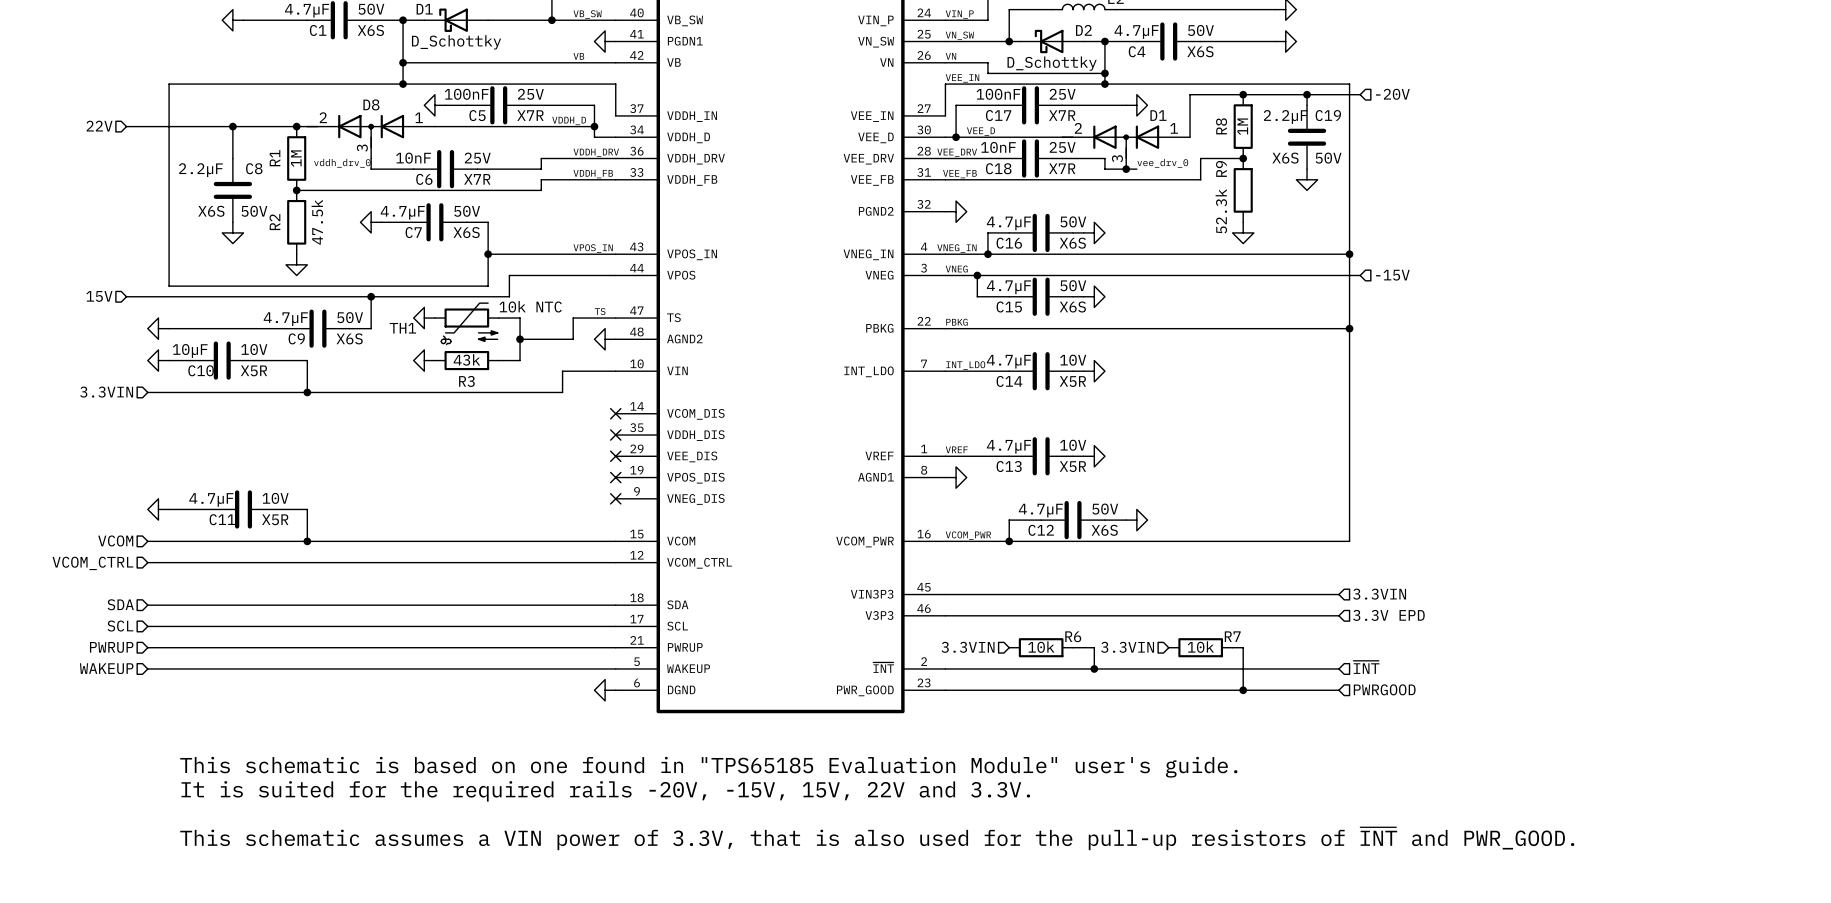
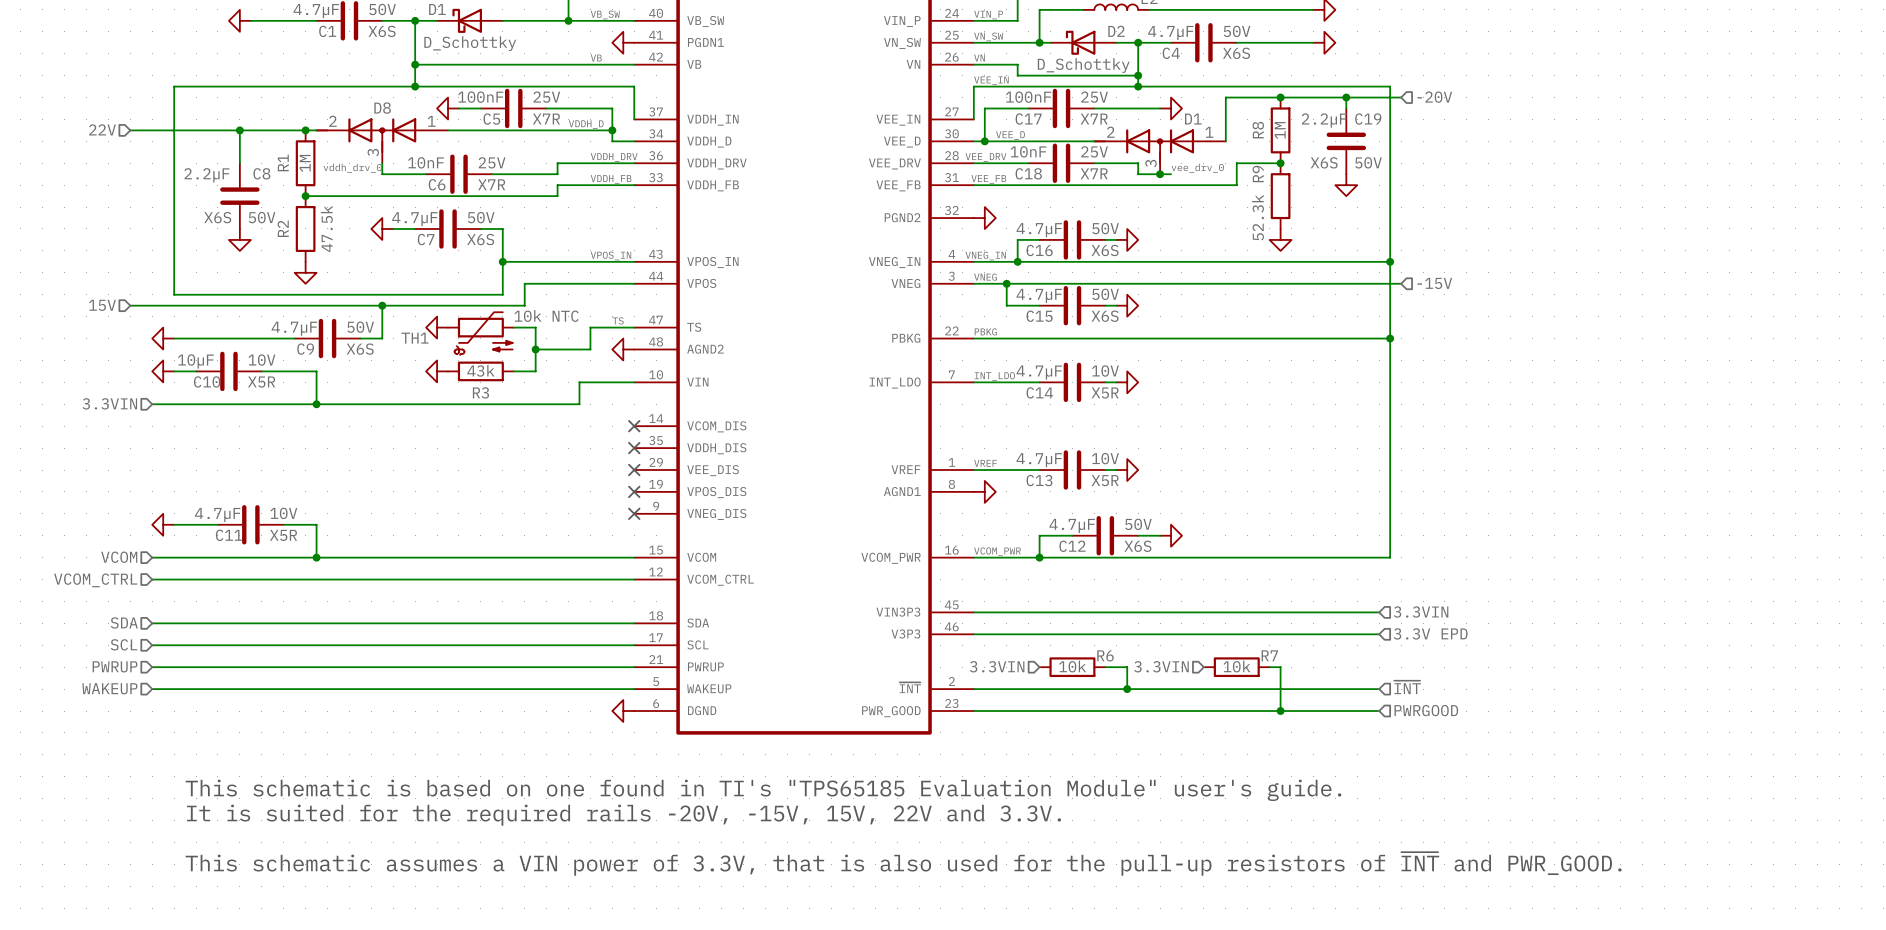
text: This schematic is based on one found in "TPS65185 Evaluation Module" user's guide. (708, 767) -> This schematic is based on one found in TI's "TPS65185 Evaluation Module" user's guide. (763, 790)

